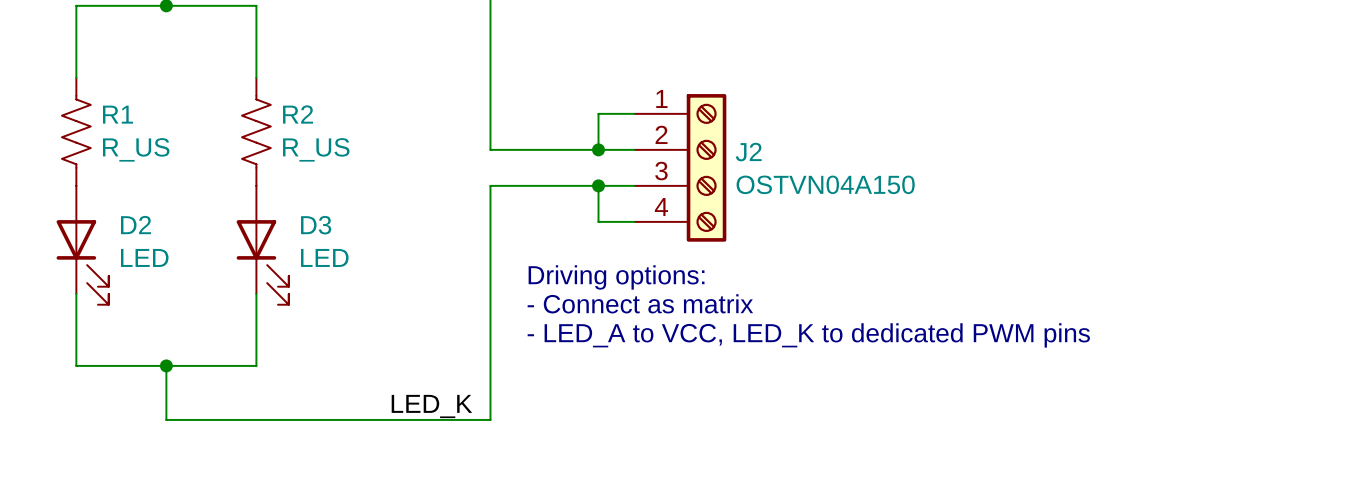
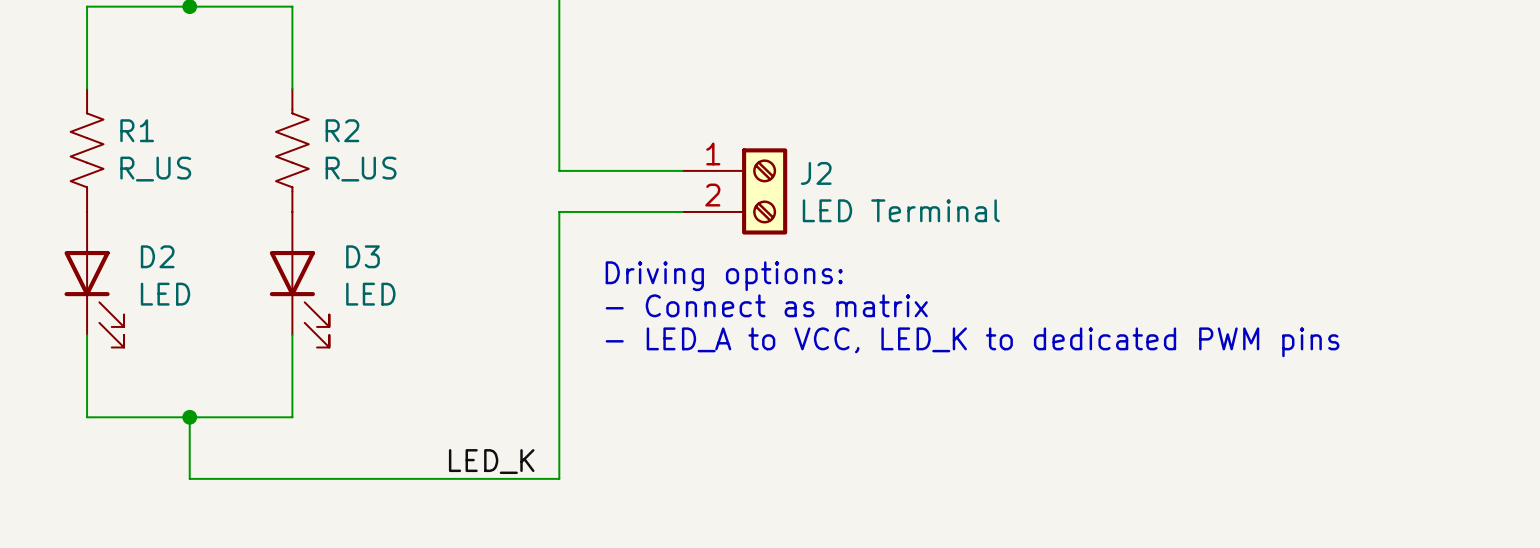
J2 symbol: [634, 94, 727, 242] -> [682, 148, 788, 235]
wire: (634, 113) (598, 113) (598, 149) (634, 149) -> none
junction: (598, 149) -> none
J2 value: OSTVN04A150 (825, 184) -> LED Terminal (901, 210)
junction: (598, 185) -> none
wire: (634, 185) (598, 185) (598, 221) (634, 221) -> none
text: none -> Driving options: (724, 276)
text: Driving options: (616, 277) -> - Connect as matrix (766, 305)
text: - Connect as matrix (640, 303) -> - LED_A to VCC, LED_K to dedicated PWM pins (972, 342)
text: - LED_A to VCC, LED_K to dedicated PWM pins (808, 335) -> none

